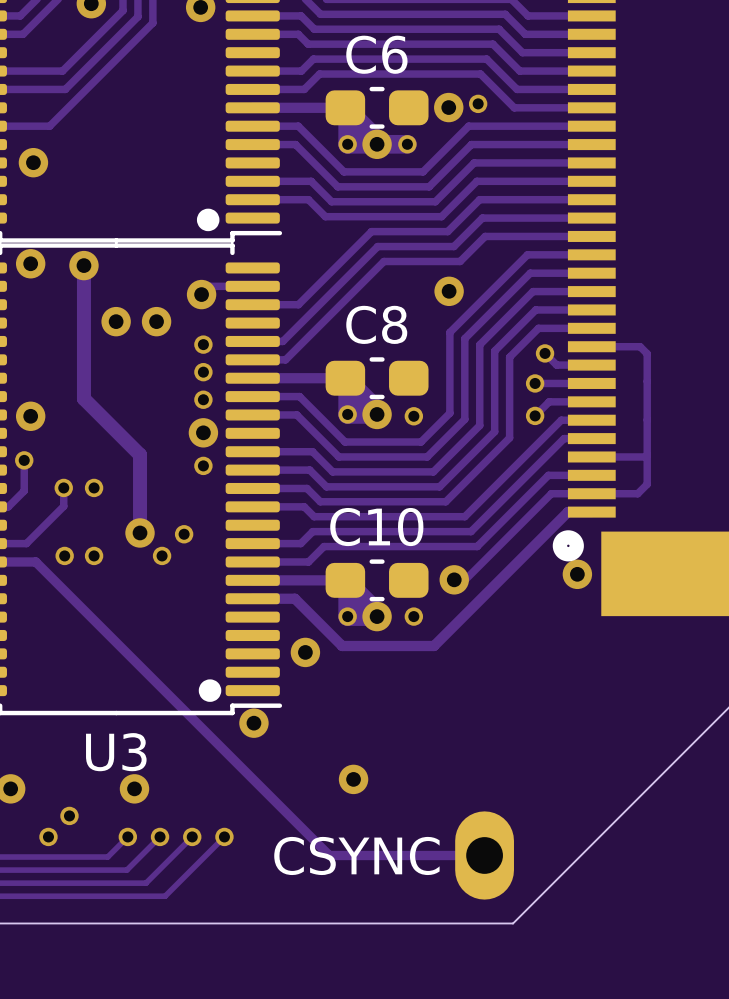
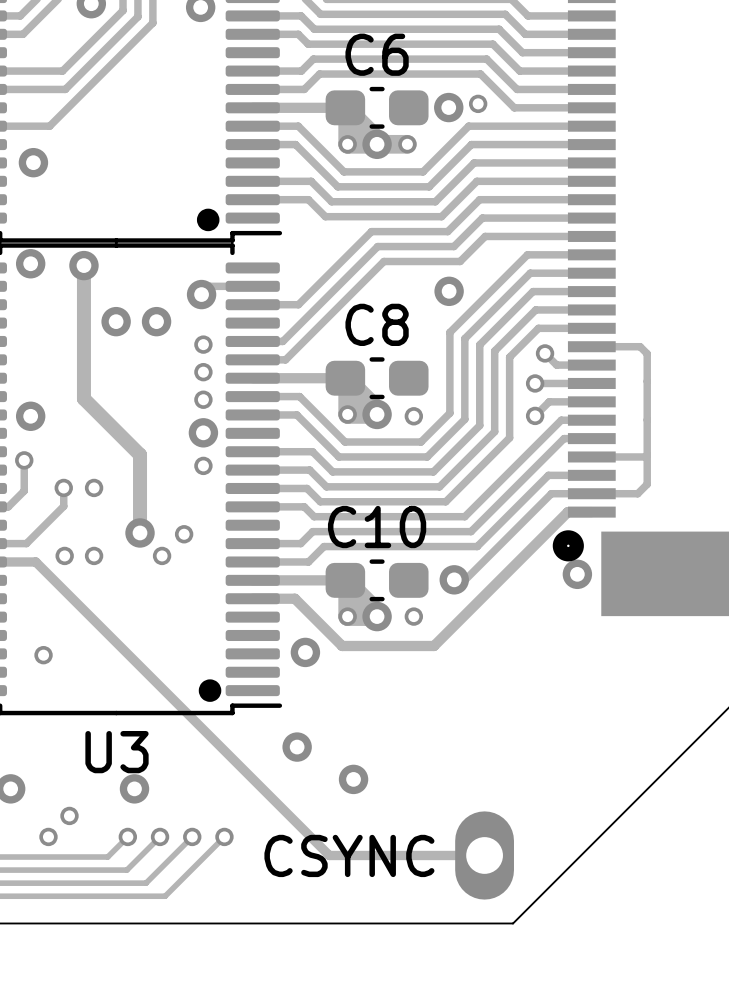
via: none -> (43, 655)
via position: (253, 723) -> (297, 747)

